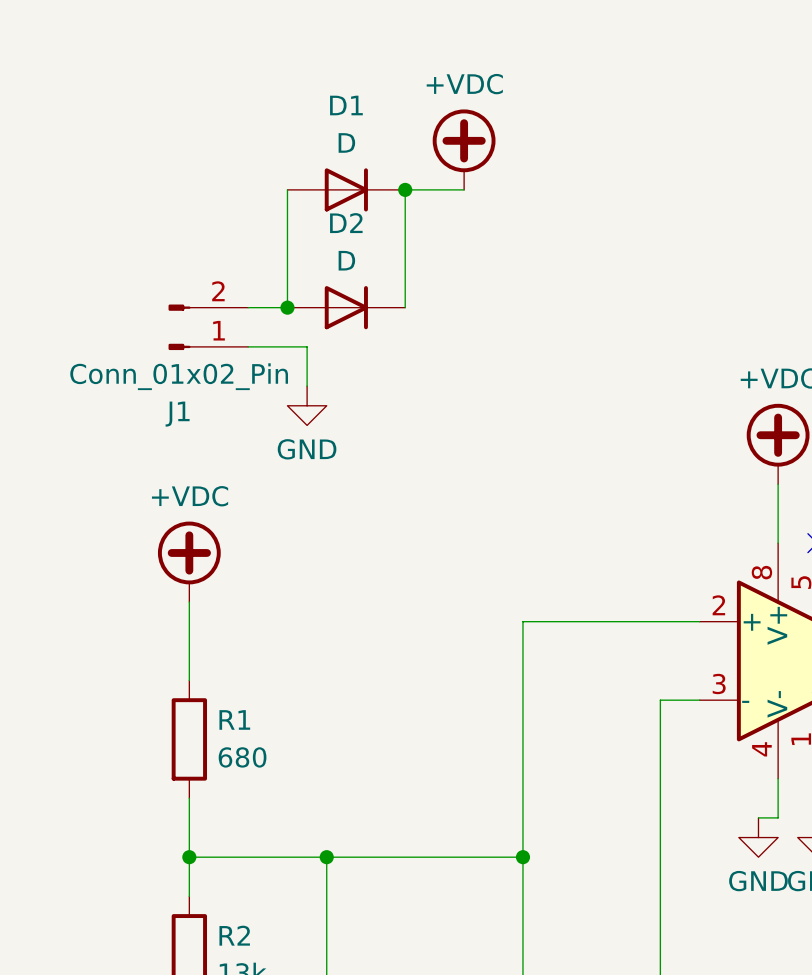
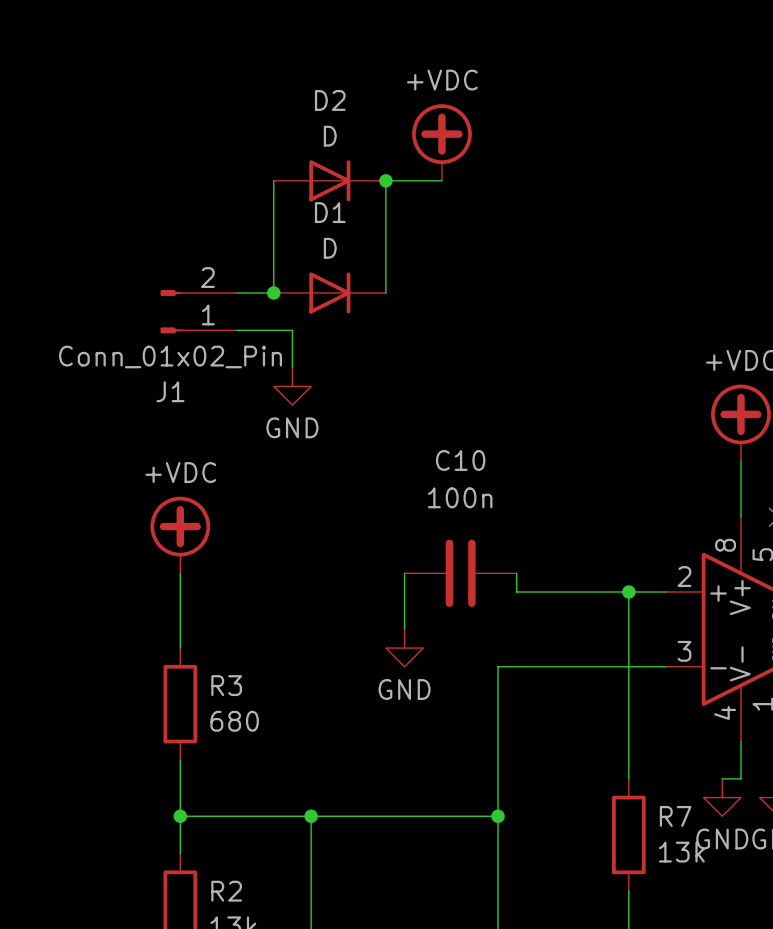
D1 name: D1 (346, 105) -> D2 (330, 100)
D2 name: D2 (346, 223) -> D1 (330, 212)
wire: none -> (404, 573) (404, 629)
C10: none -> 100n (460, 573)
wire: (542, 621) (522, 621) (522, 700) -> (516, 592) (516, 573)
wire: none -> (628, 592) (628, 666) (498, 666)
junction: none -> (628, 592)
power symbol: none -> GND (404, 648)
R1 name: R1 (234, 719) -> R3 (226, 685)
wire: (660, 817) (660, 935) -> none
R7: none -> 13k (628, 834)

